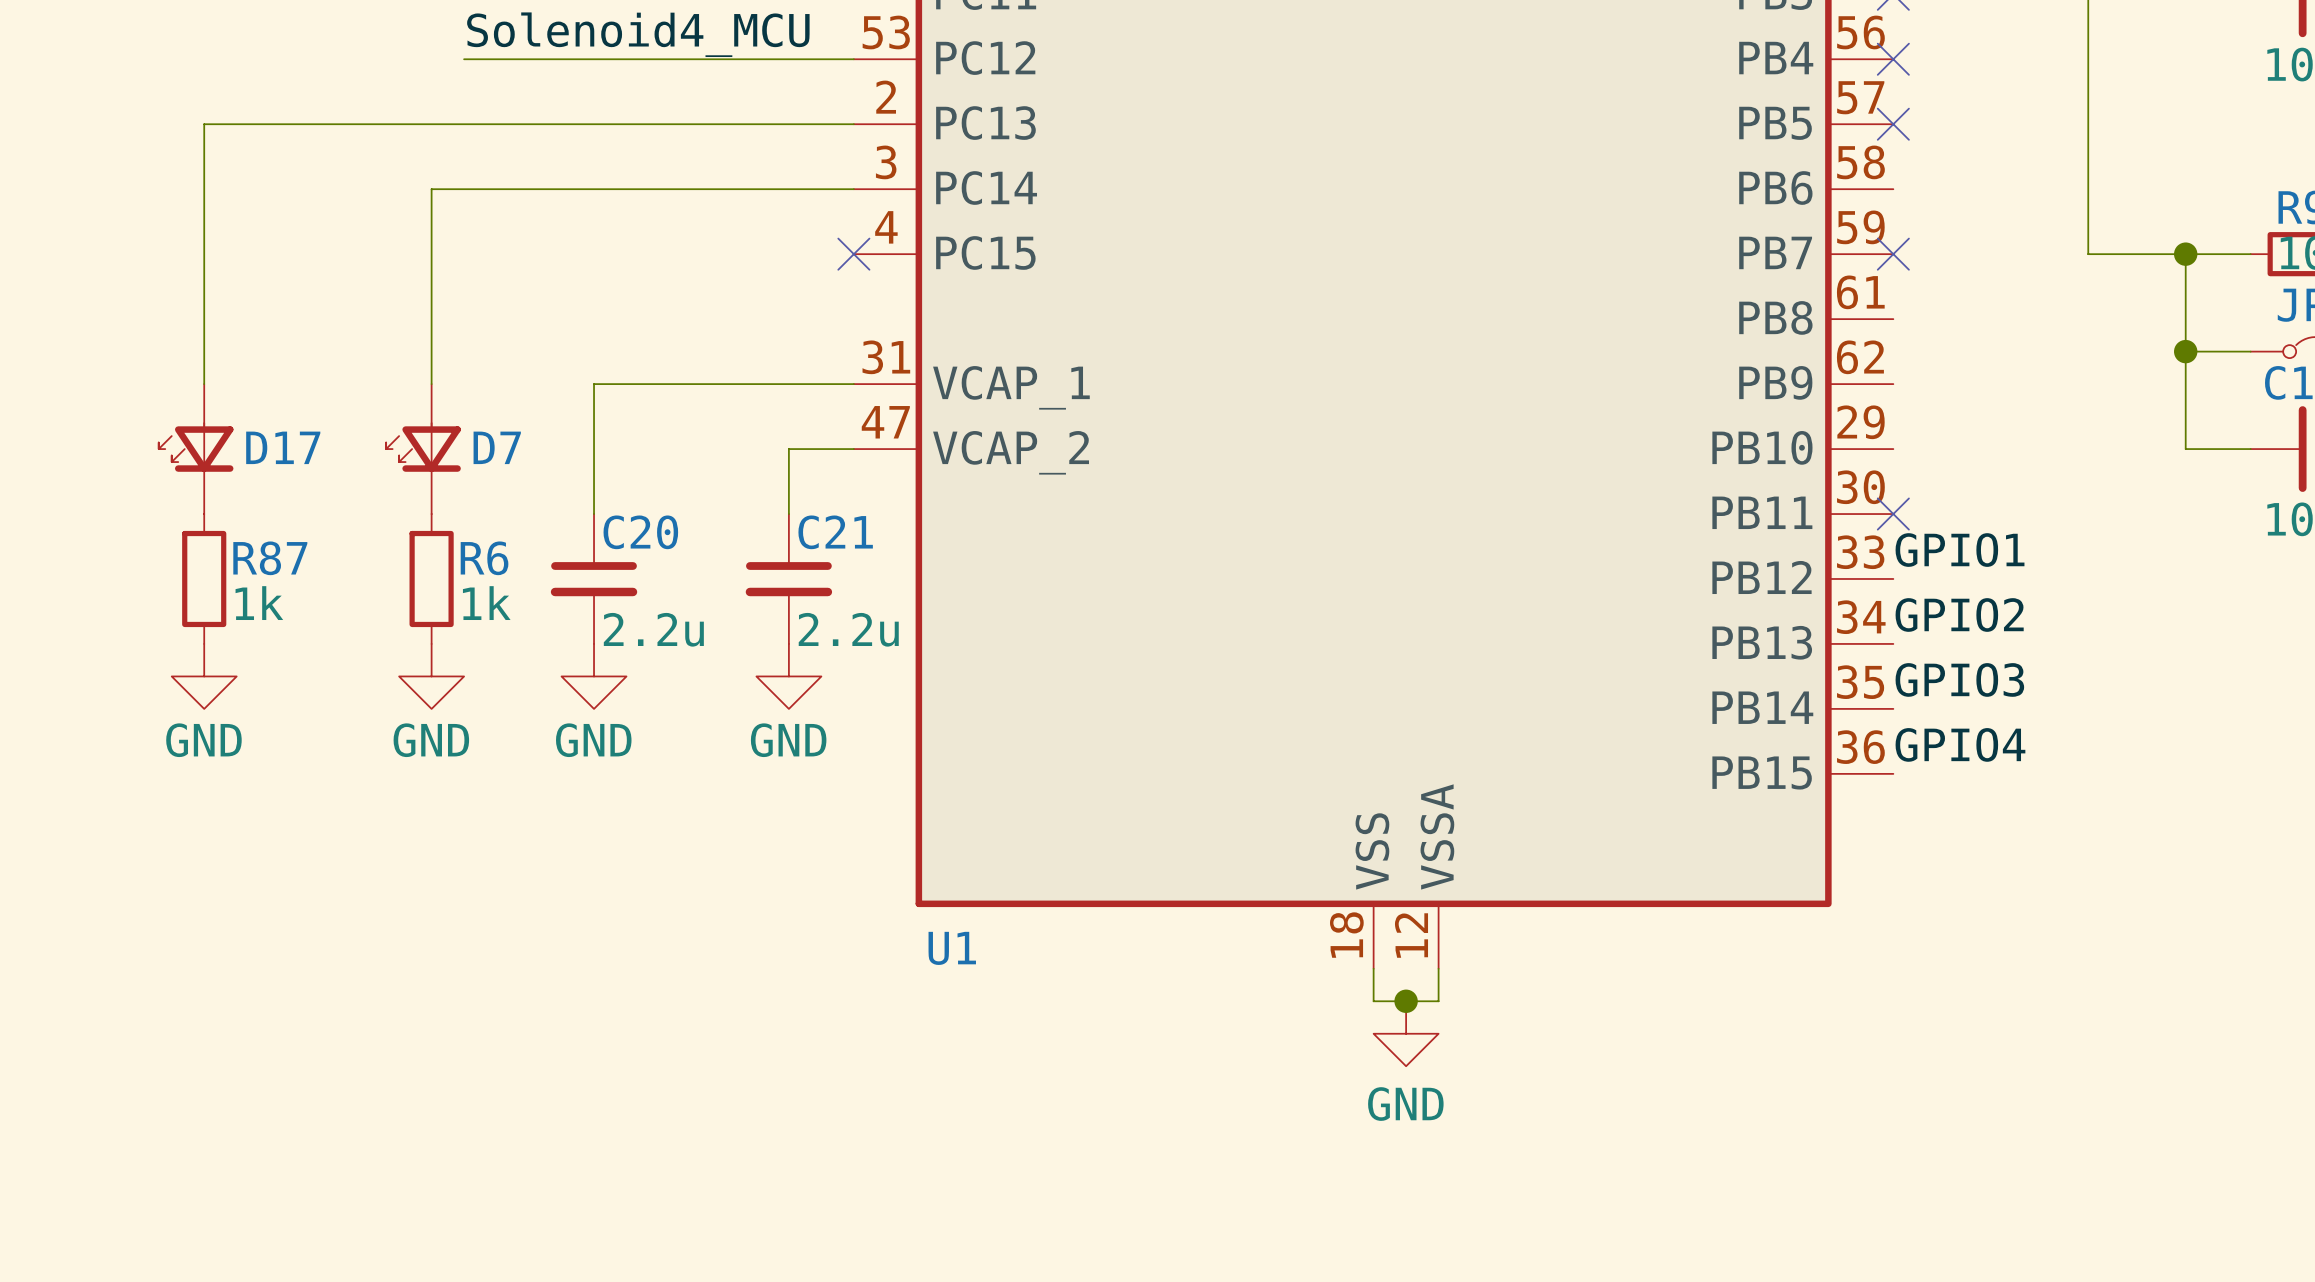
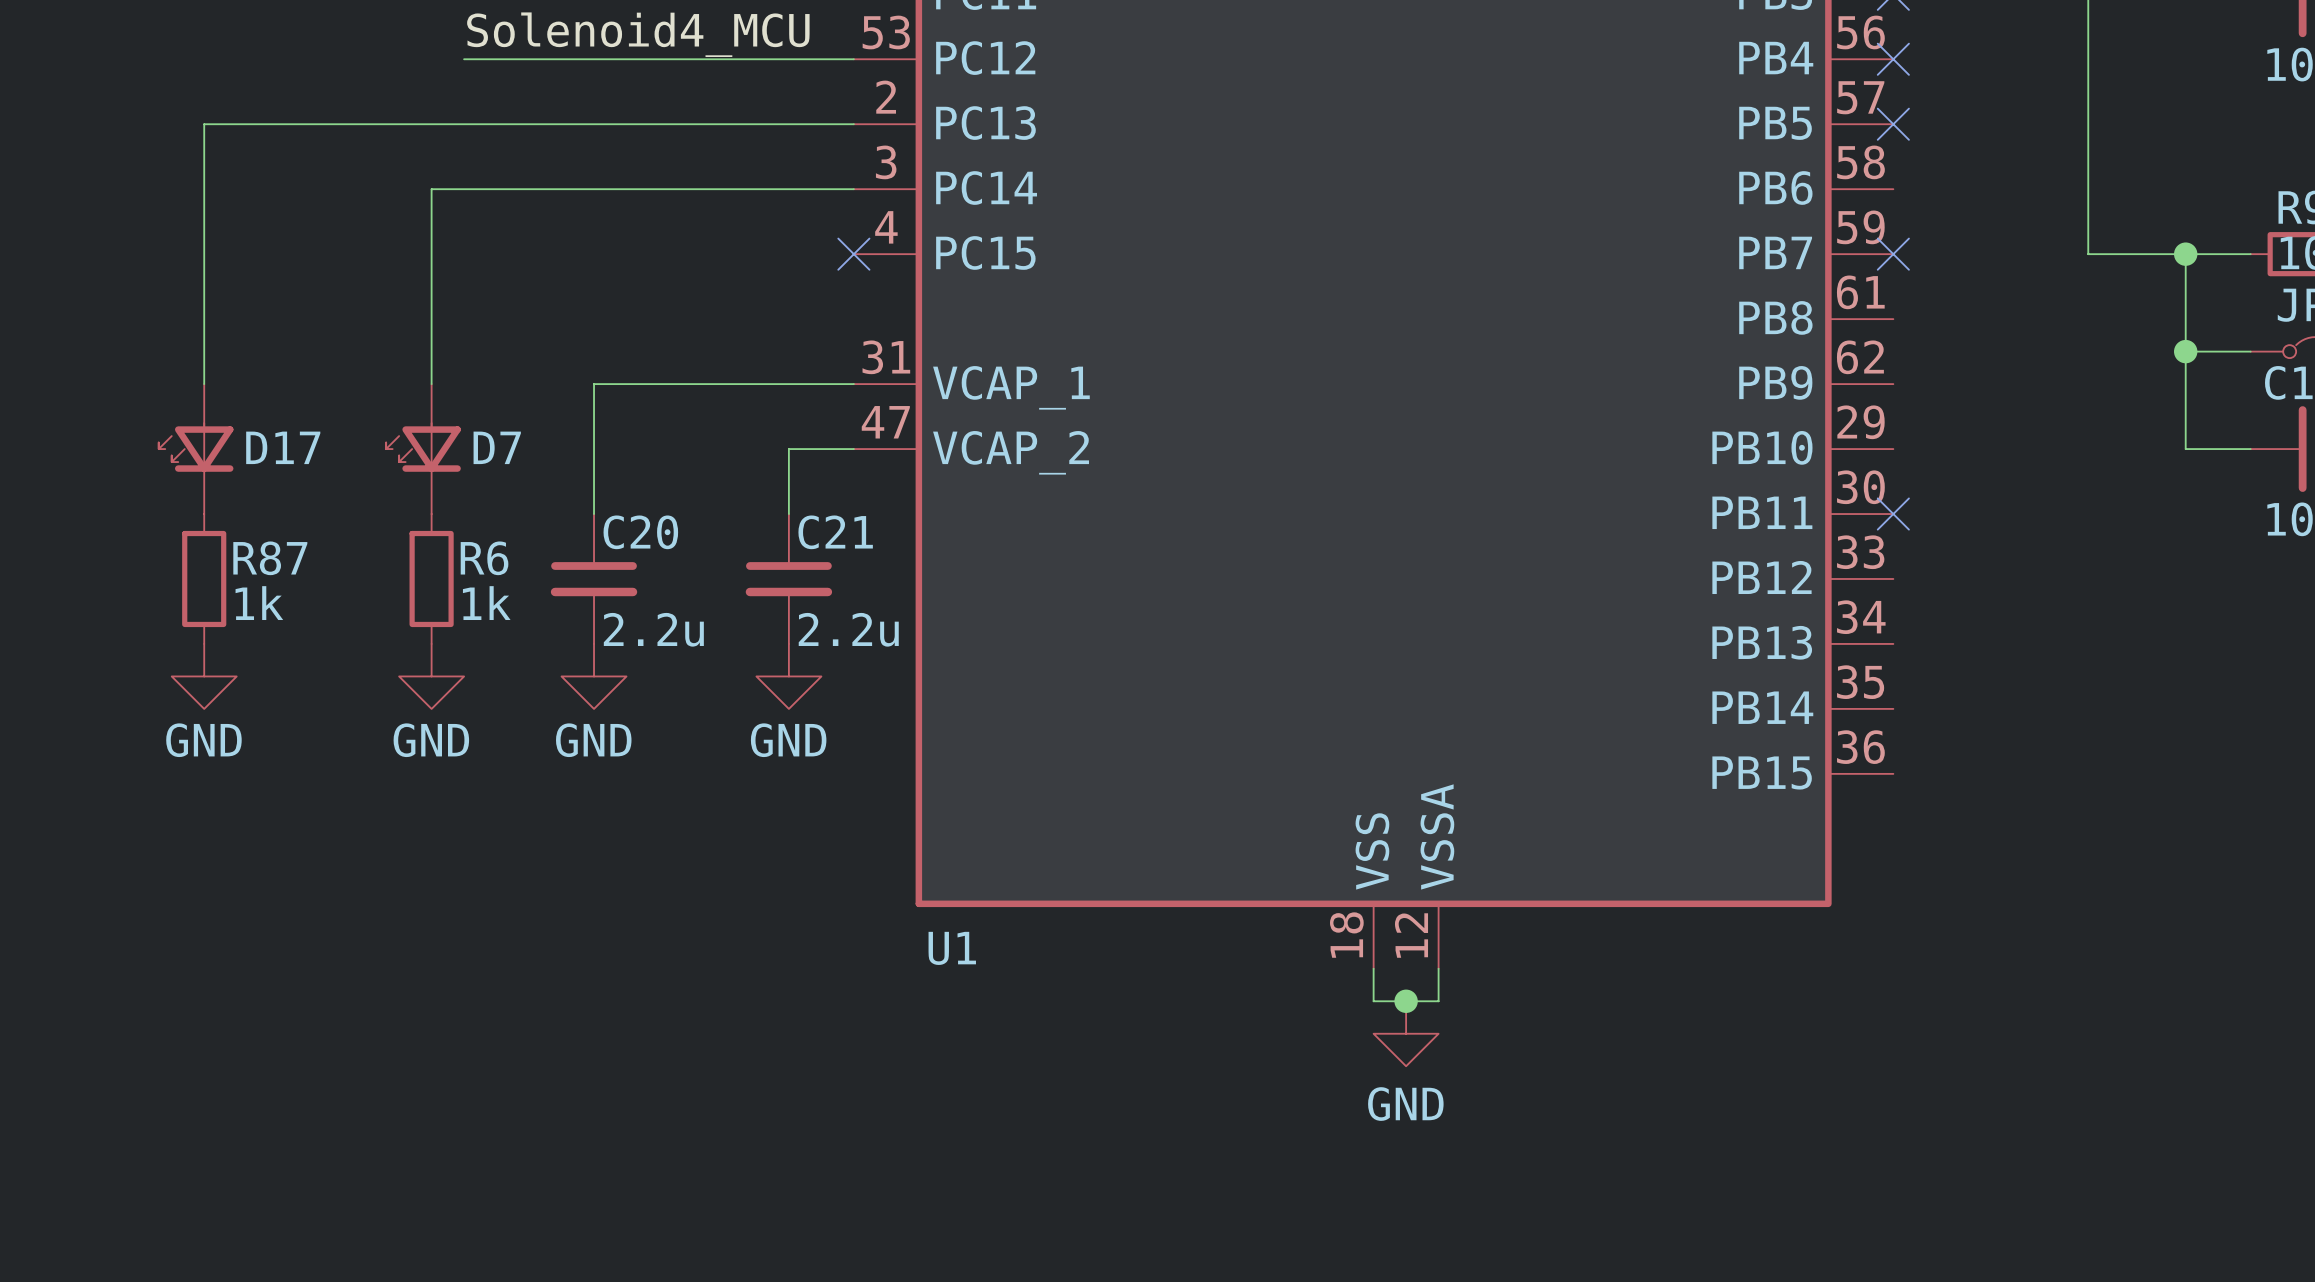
label: GPIO1 (1960, 550) -> none
label: GPIO2 (1959, 614) -> none
label: GPIO3 (1959, 679) -> none
label: GPIO4 (1960, 744) -> none

